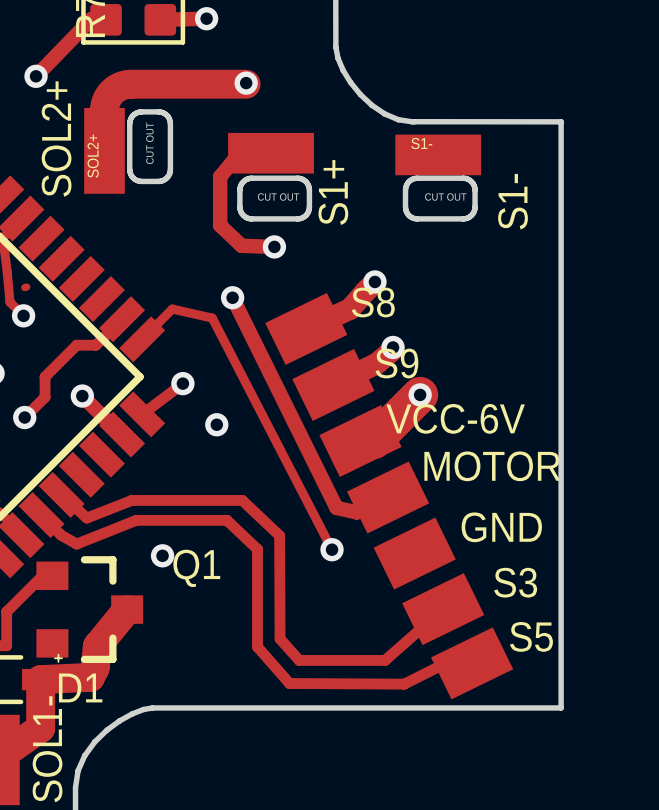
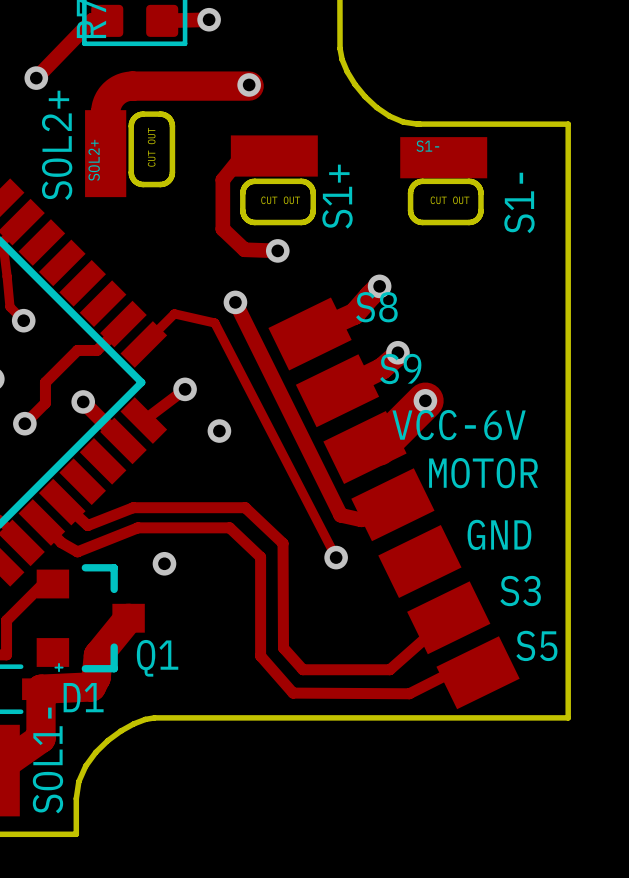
track: (26, 287) (24, 287) -> none
text position: Q1 (196, 568) -> Q1 (157, 658)

